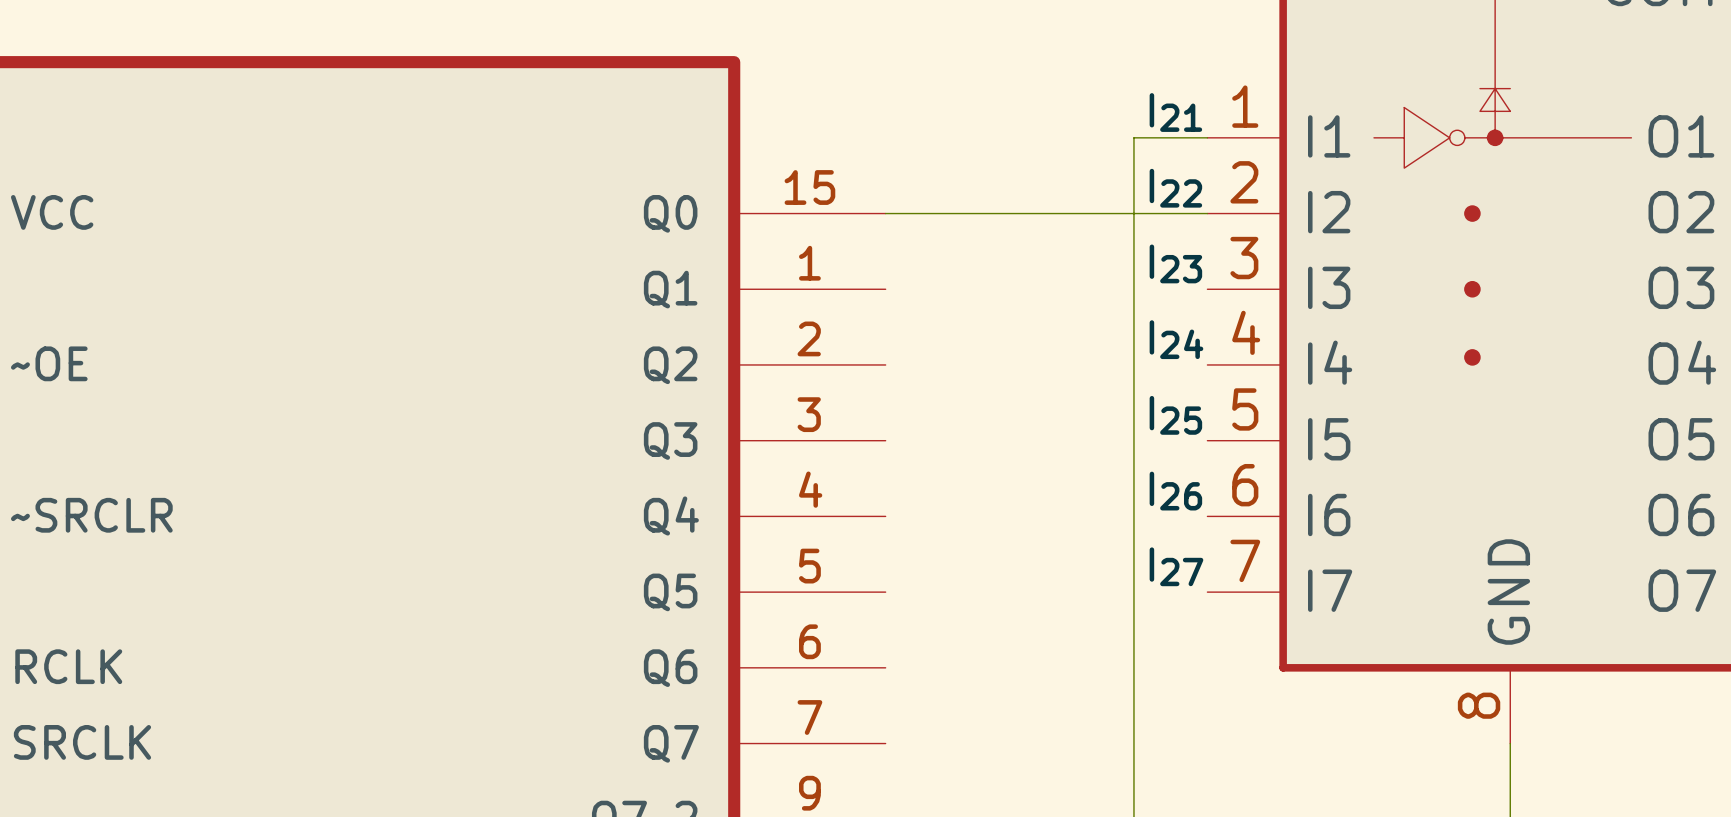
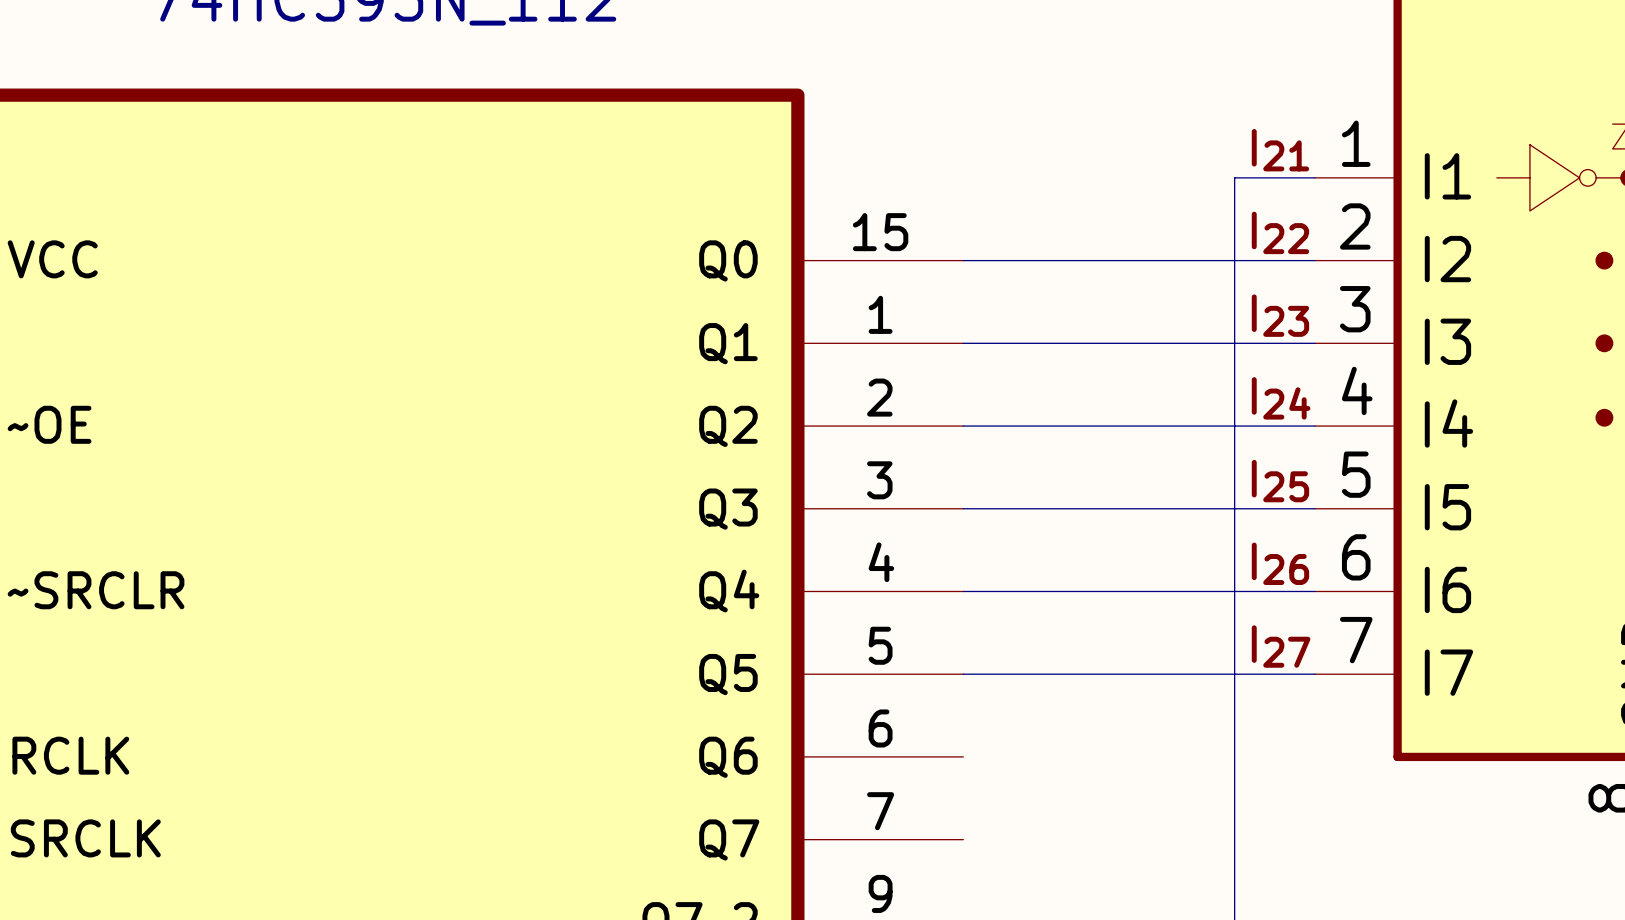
wire: none -> (963, 343) (1314, 343)
wire: none -> (963, 426) (1314, 426)
wire: none -> (963, 508) (1314, 508)
wire: none -> (963, 591) (1314, 591)
wire: none -> (963, 674) (1314, 674)

